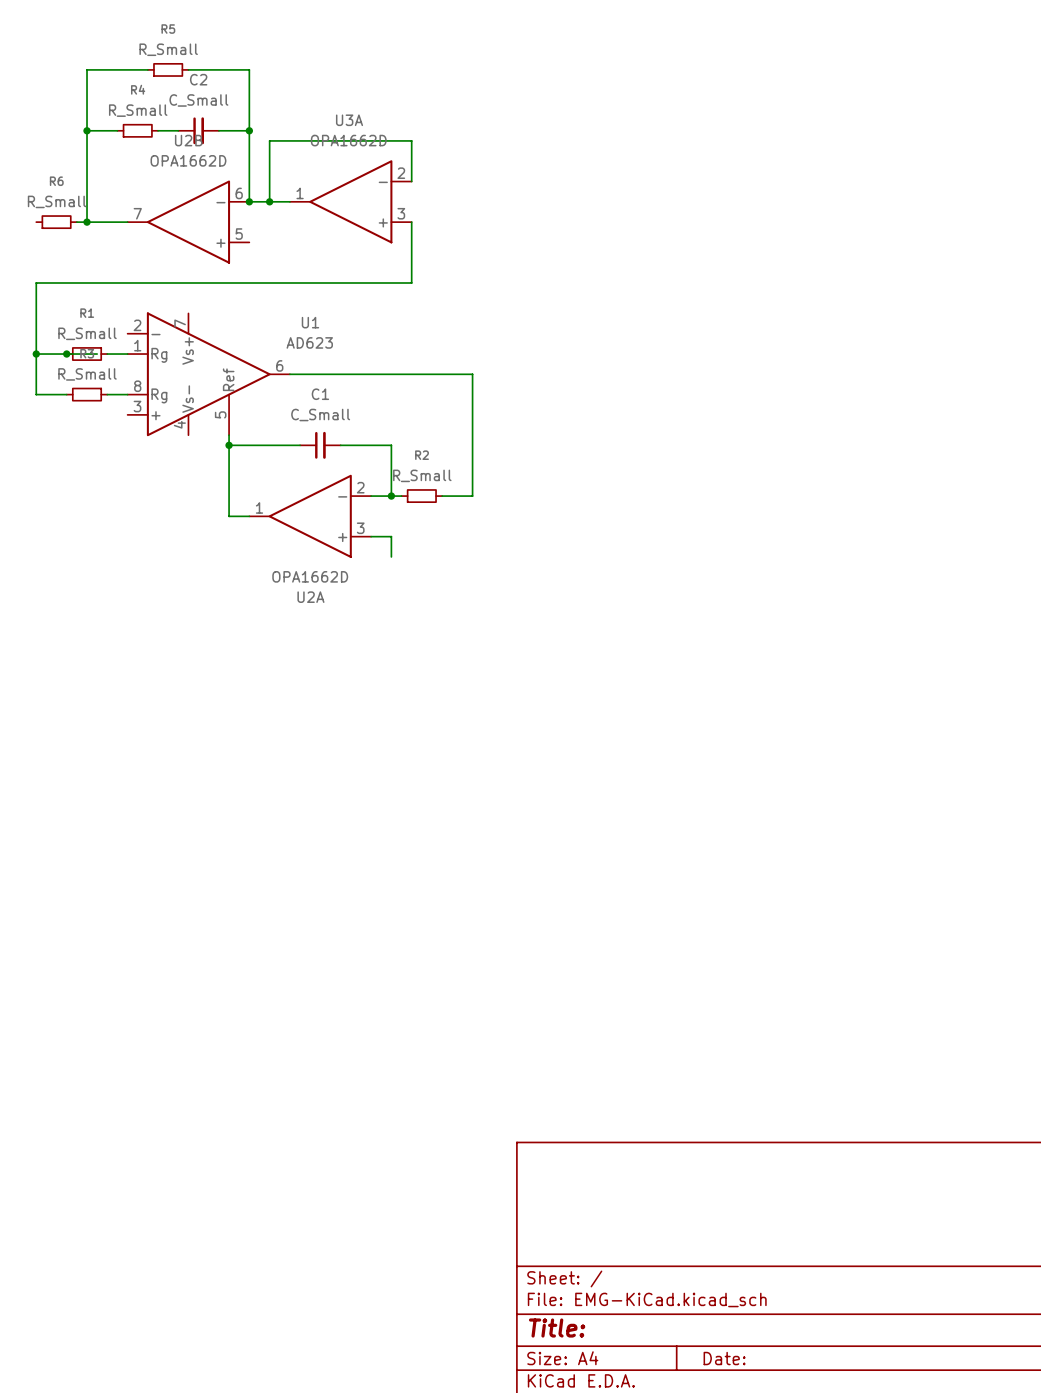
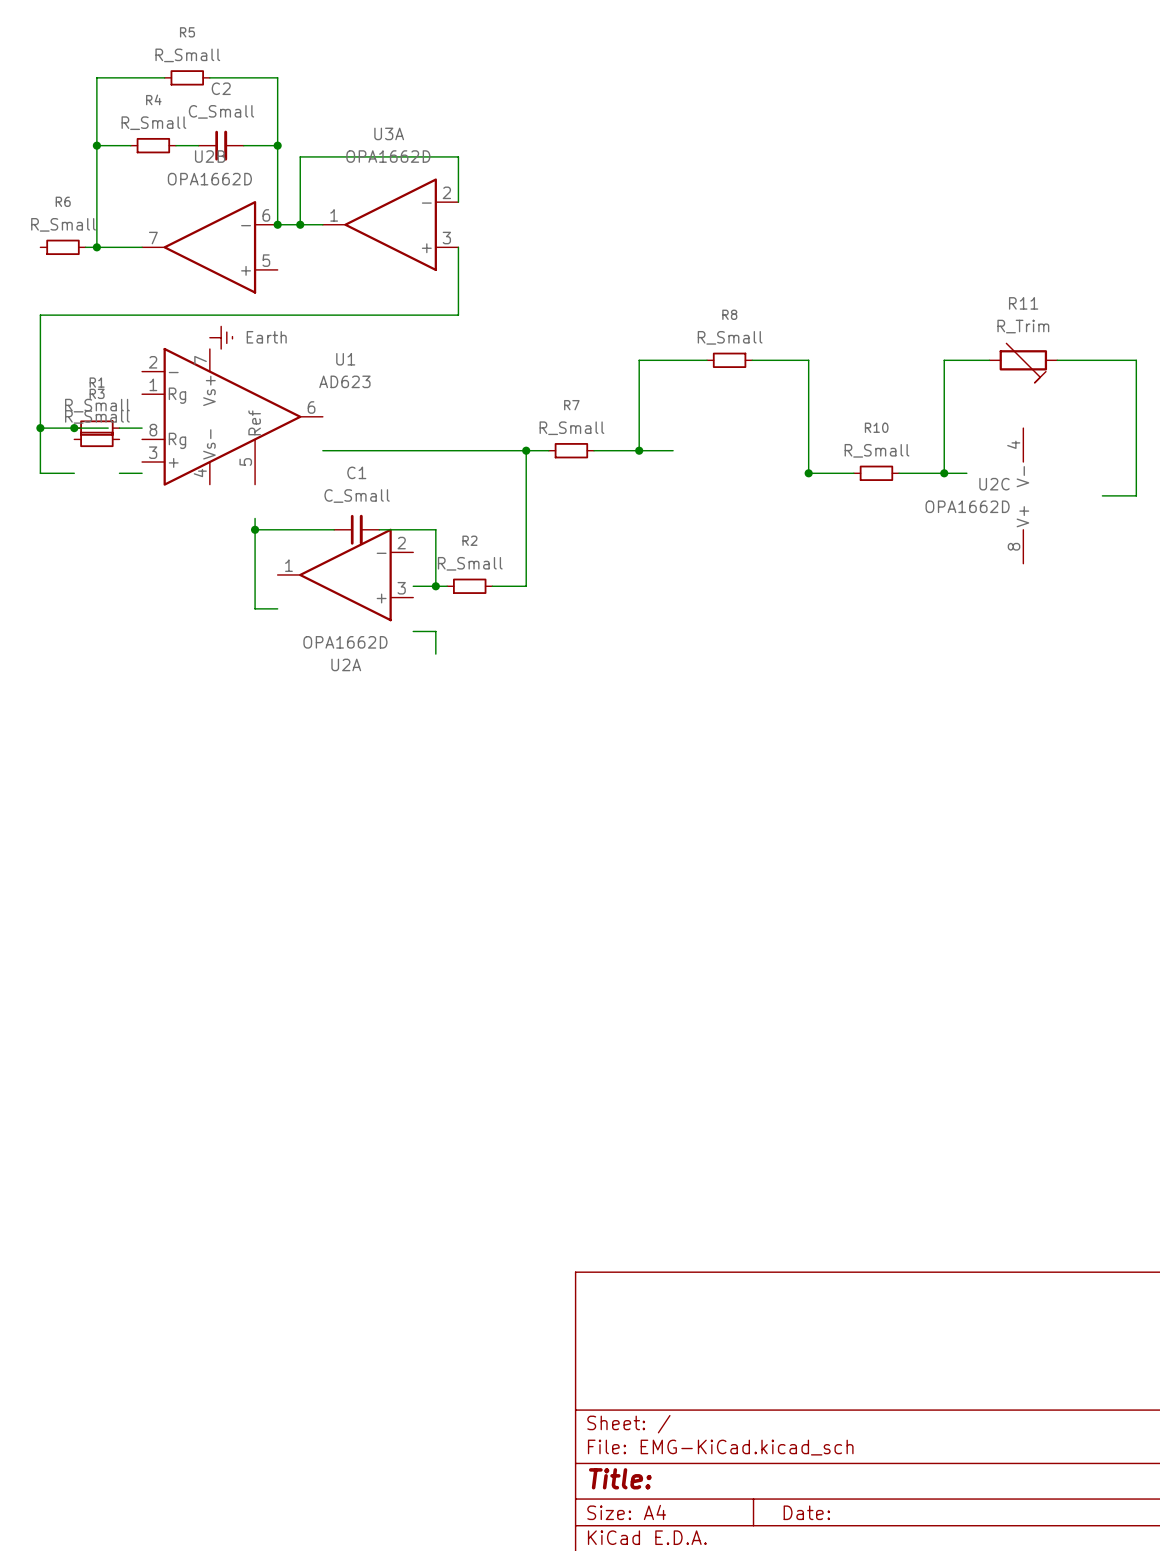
power symbol: none -> Earth (221, 337)
wire: none -> (706, 360) (639, 360) (639, 450)
R8: none -> R_Small (729, 360)
wire: none -> (752, 360) (808, 360) (808, 473) (853, 473)
wire: none -> (989, 360) (944, 360) (944, 473)
wire: none -> (1057, 360) (1136, 360) (1136, 495) (1102, 495)
R11: none -> R_Trim (1023, 363)
wire: (36, 354) (97, 354) -> (40, 428) (108, 428)
junction: (36, 354) -> none
junction: (66, 354) -> none
R1 position: (87, 354) -> (96, 428)
wire: (107, 354) (127, 354) -> (119, 428) (142, 428)
wire: (289, 374) (472, 374) (472, 404) -> none
junction: none -> (40, 428)
junction: none -> (74, 428)
wire: (36, 394) (66, 394) -> (40, 439) (40, 473) (74, 473)
wire: (107, 394) (127, 394) -> (119, 473) (142, 473)
wire: none -> (322, 450) (548, 450)
junction: none -> (526, 450)
R7: none -> R_Small (571, 450)
wire: none -> (594, 450) (673, 450)
junction: none -> (639, 450)
junction: none -> (808, 473)
R10: none -> R_Small (876, 473)
wire: none -> (899, 473) (966, 473)
junction: none -> (944, 473)
wire: (229, 435) (229, 465) -> (435, 552) (435, 586)
wire: (229, 445) (300, 445) -> (255, 529) (334, 529)
junction position: (229, 445) -> (255, 529)
C1 position: (320, 445) -> (356, 529)
wire: (340, 445) (391, 445) (391, 475) -> (379, 529) (435, 529)
U2C: none -> OPA1662D (1023, 495)
wire: (371, 496) (401, 496) -> (413, 586) (447, 586)
junction position: (391, 496) -> (435, 586)
R2 position: (421, 496) -> (469, 586)
wire: (442, 496) (472, 496) -> (492, 586) (526, 586) (526, 552)
wire: (229, 516) (249, 516) -> (255, 574) (255, 608) (277, 608)
wire: (371, 536) (391, 536) (391, 556) -> (413, 631) (435, 631) (435, 654)

